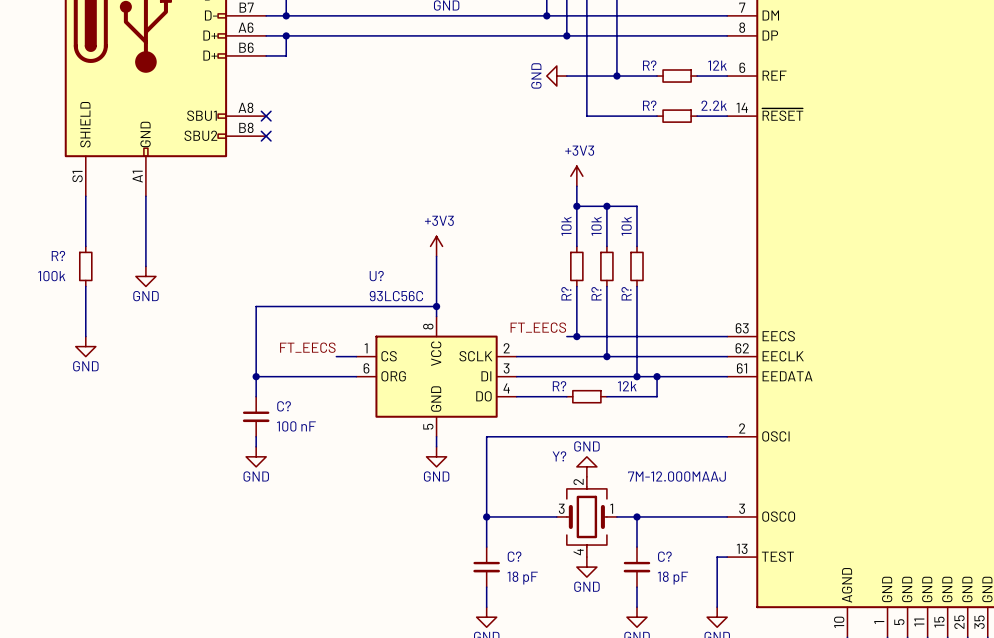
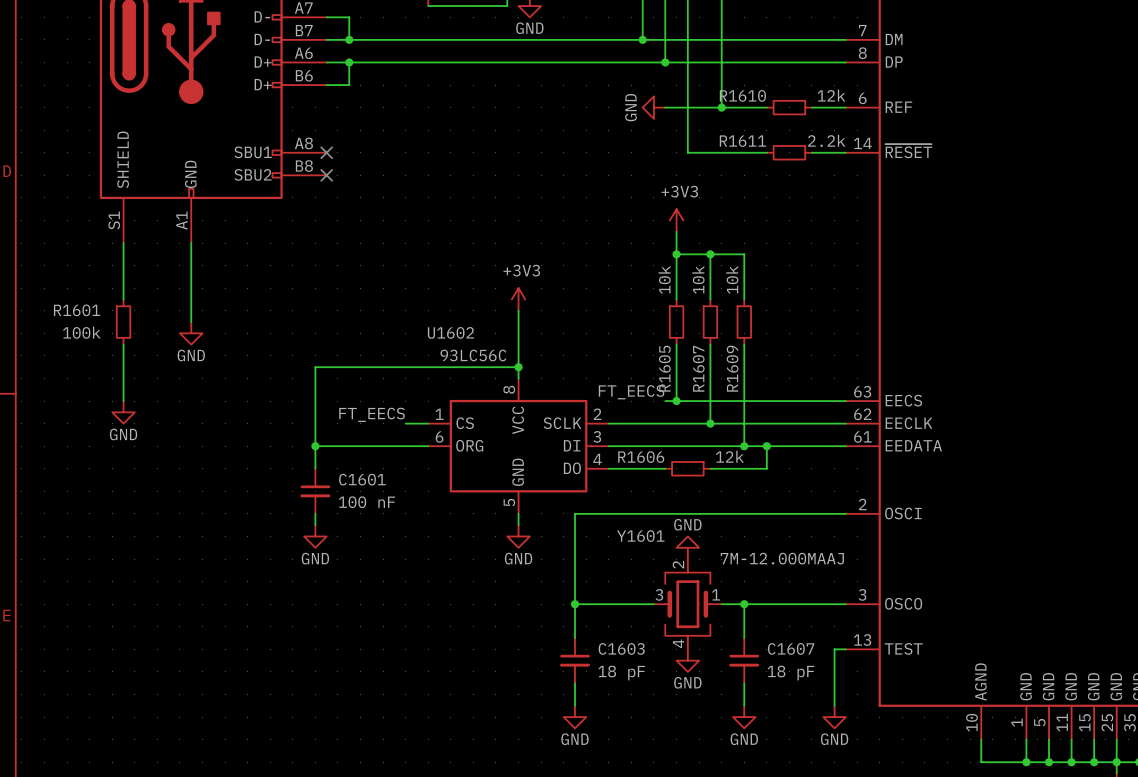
R? name: R? (649, 65) -> R1610 (742, 95)
R? name: R? (649, 105) -> R1611 (742, 141)
R? name: R? (58, 255) -> R1601 (77, 310)
U? name: U? (376, 276) -> U1602 (450, 332)
R? name: R? (566, 293) -> R1605 (664, 368)
R? name: R? (596, 293) -> R1607 (698, 368)
R? name: R? (626, 293) -> R1609 (732, 368)
R? name: R? (559, 386) -> R1606 (641, 457)
C? name: C? (284, 406) -> C1601 (362, 479)
Y? name: Y? (559, 456) -> Y1601 (640, 536)
C? name: C? (514, 556) -> C1603 (621, 648)
C? name: C? (664, 556) -> C1607 (791, 648)

